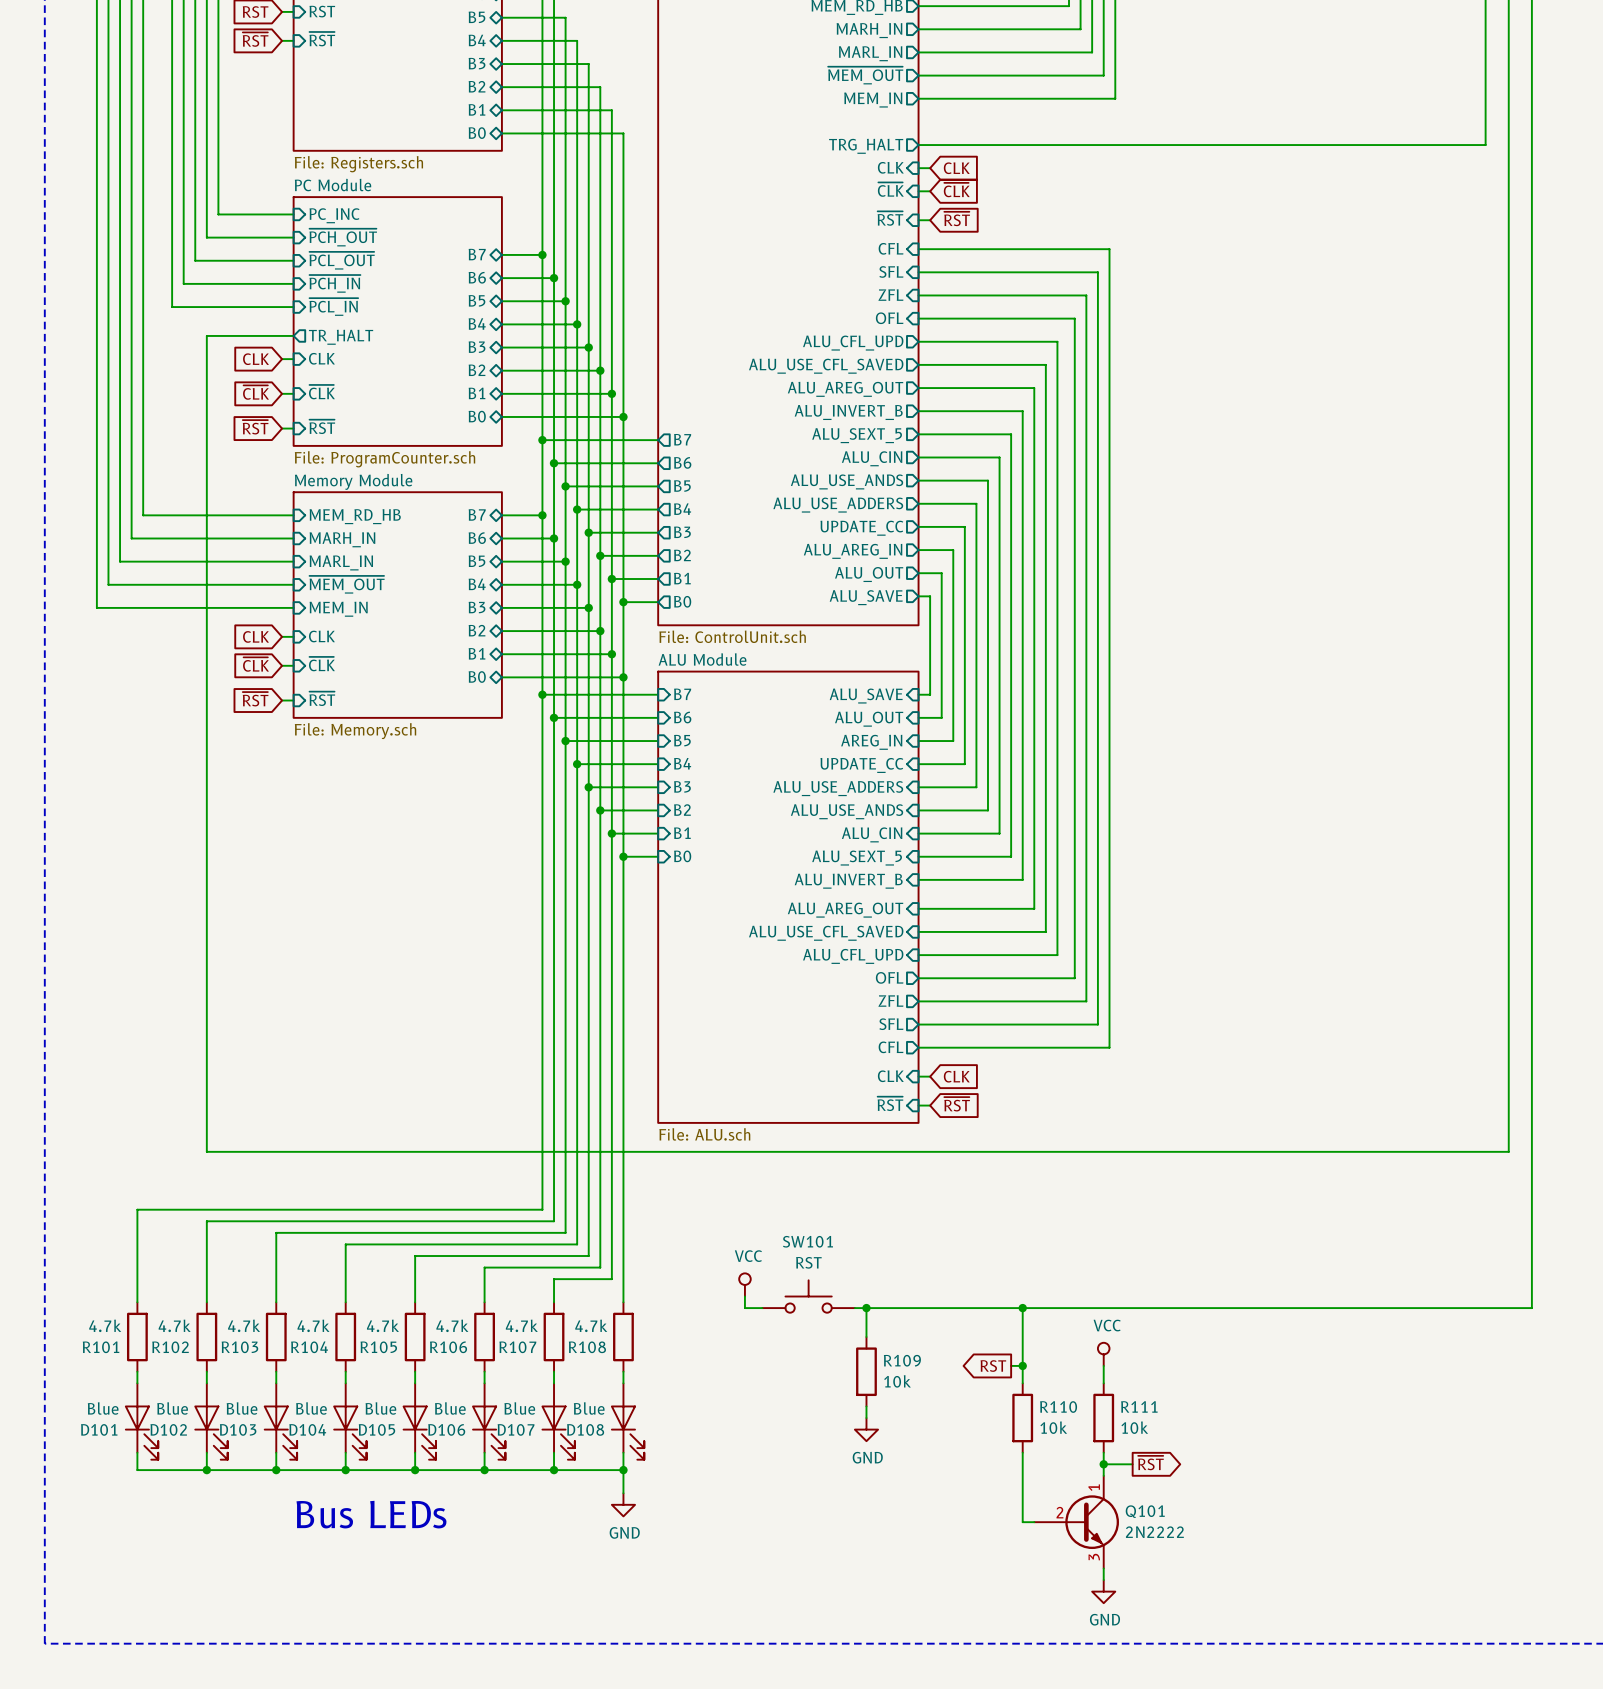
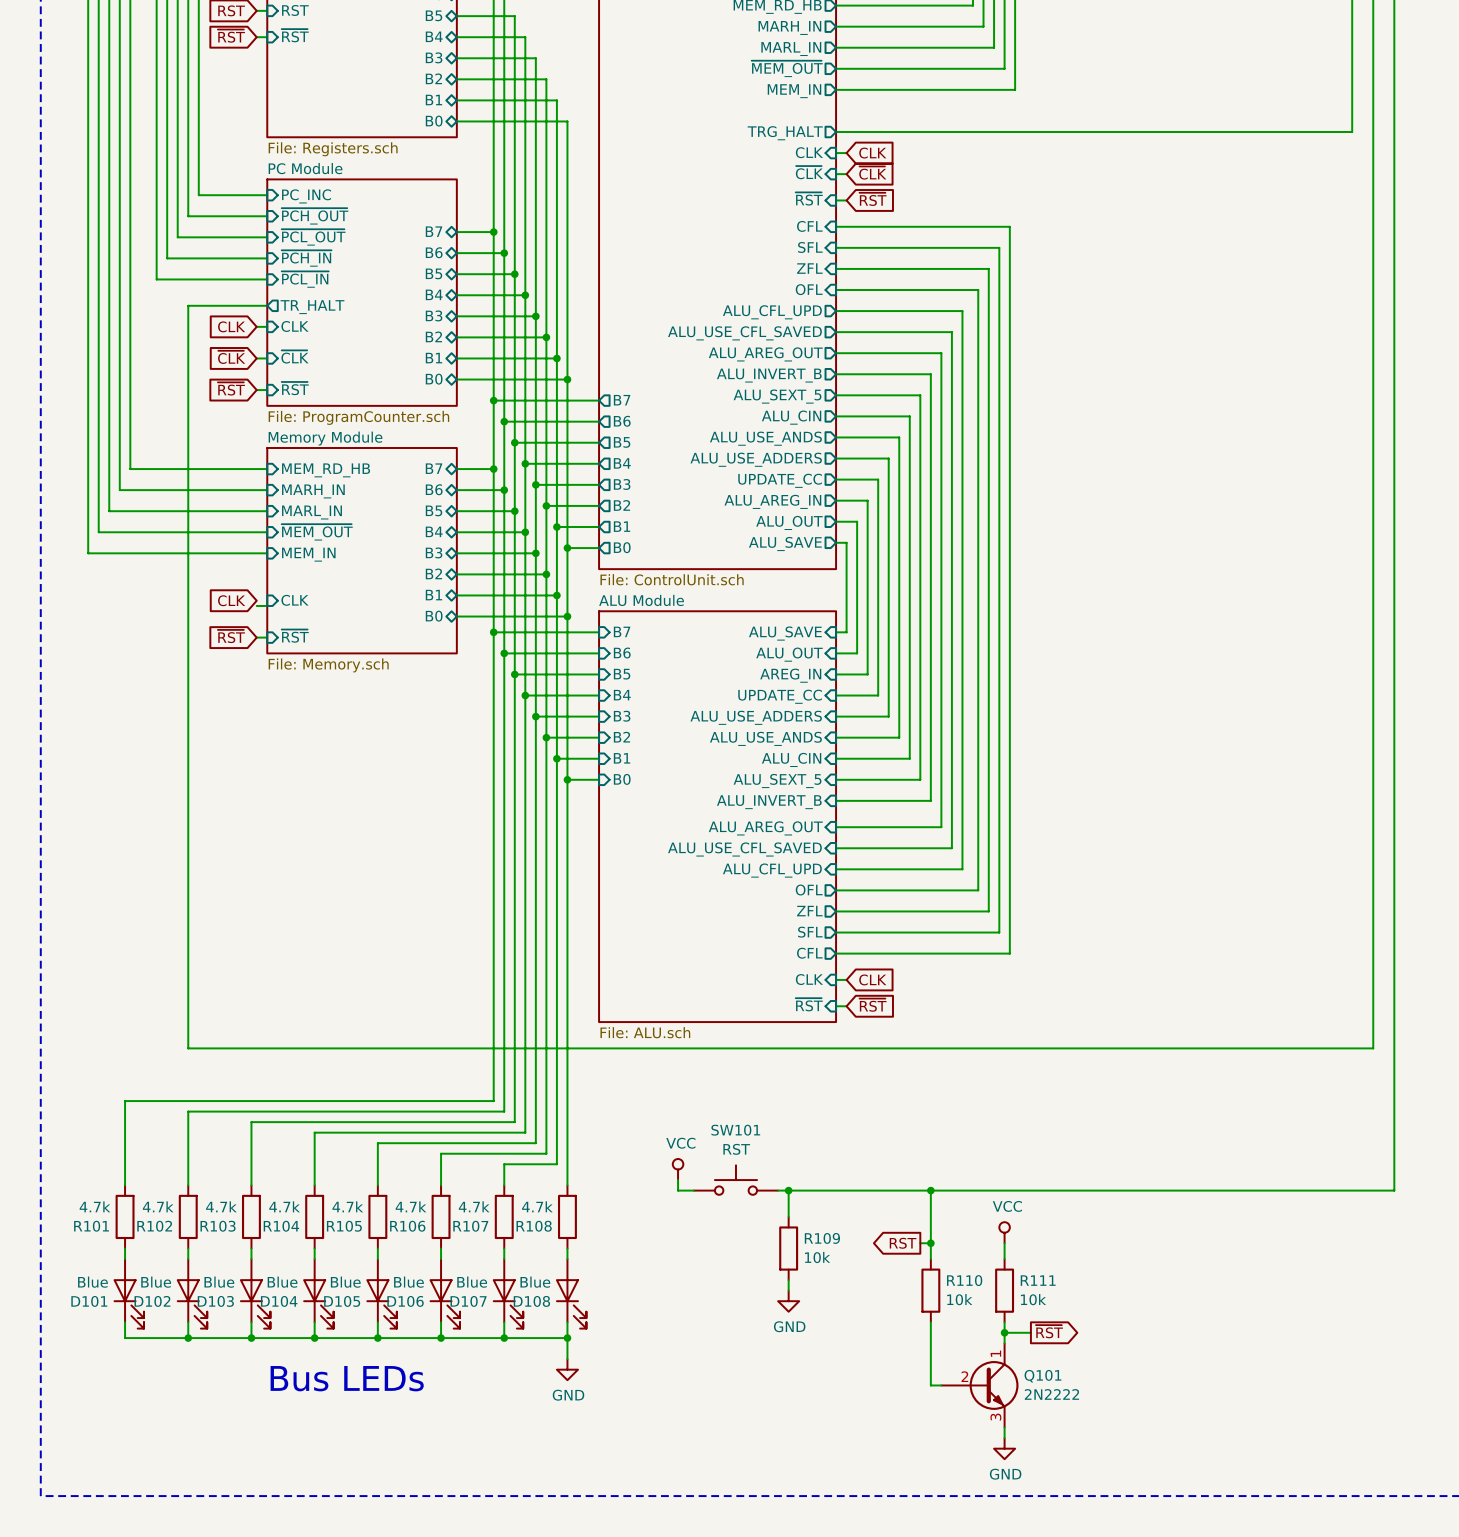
global label: CLK (256, 636) -> none
wire: (282, 636) (293, 636) -> none
sheet pin: CLK (321, 636) -> none
global label: ~{CLK} (256, 664) -> CLK (231, 600)
sheet pin: ~{CLK} (321, 664) -> CLK (294, 600)

